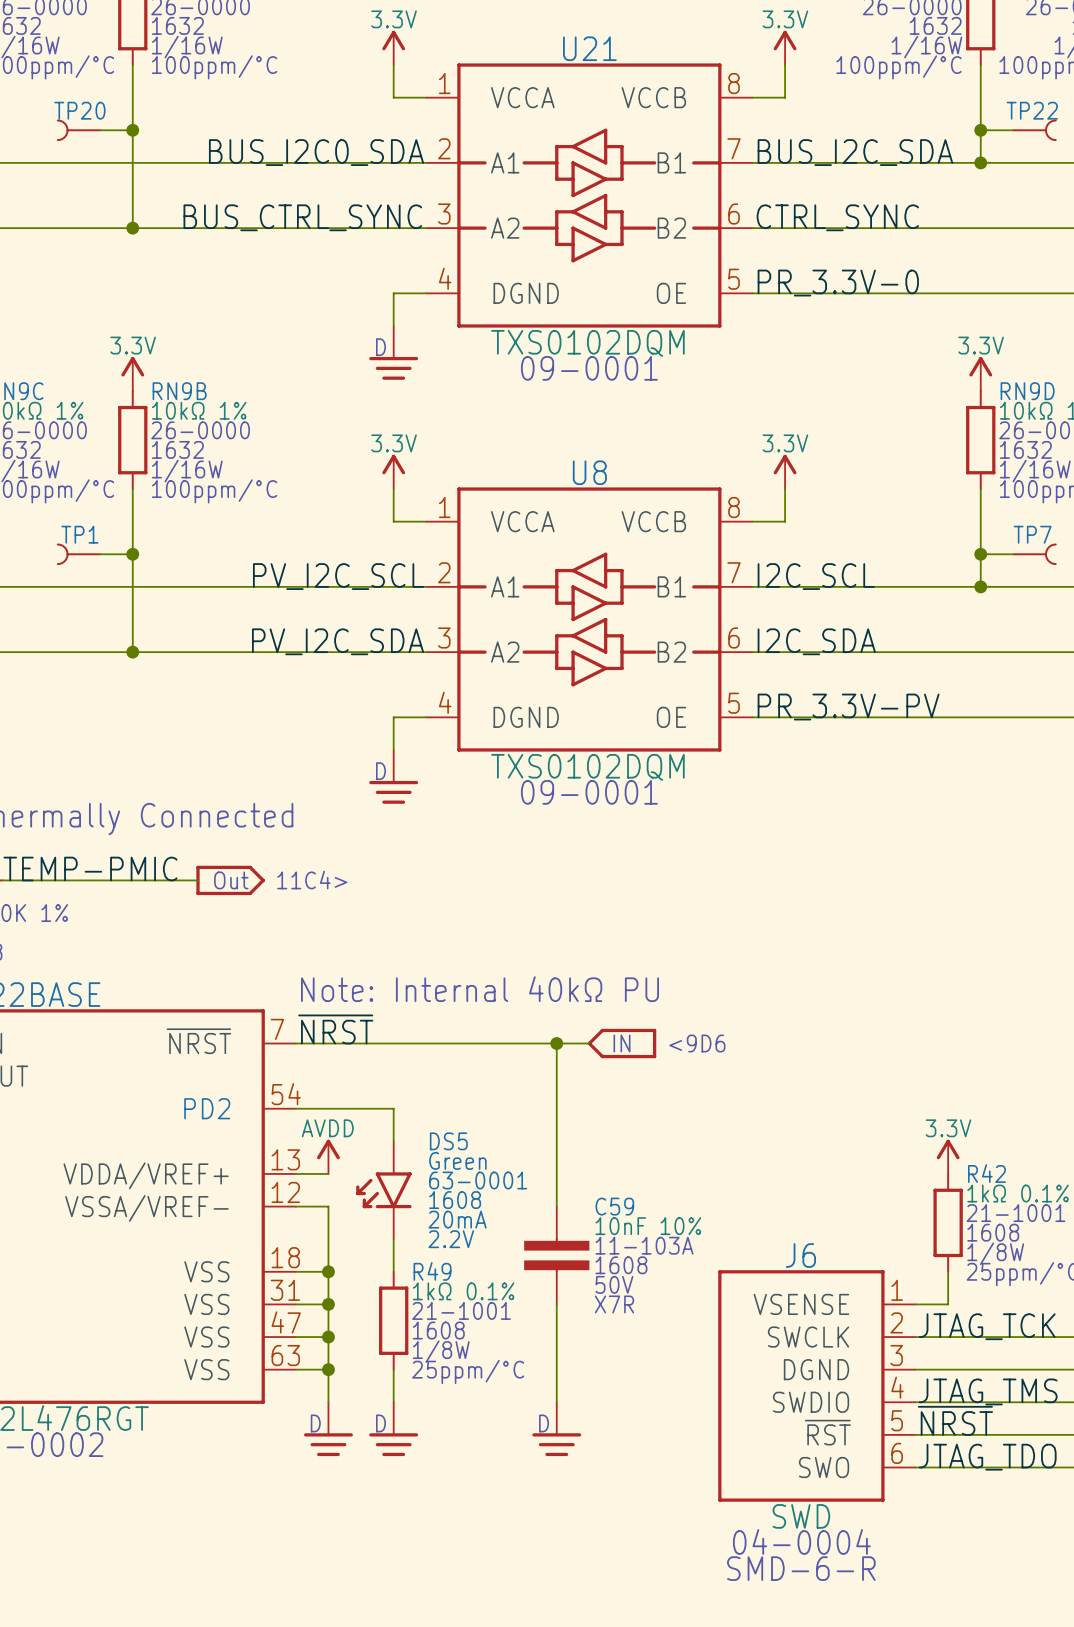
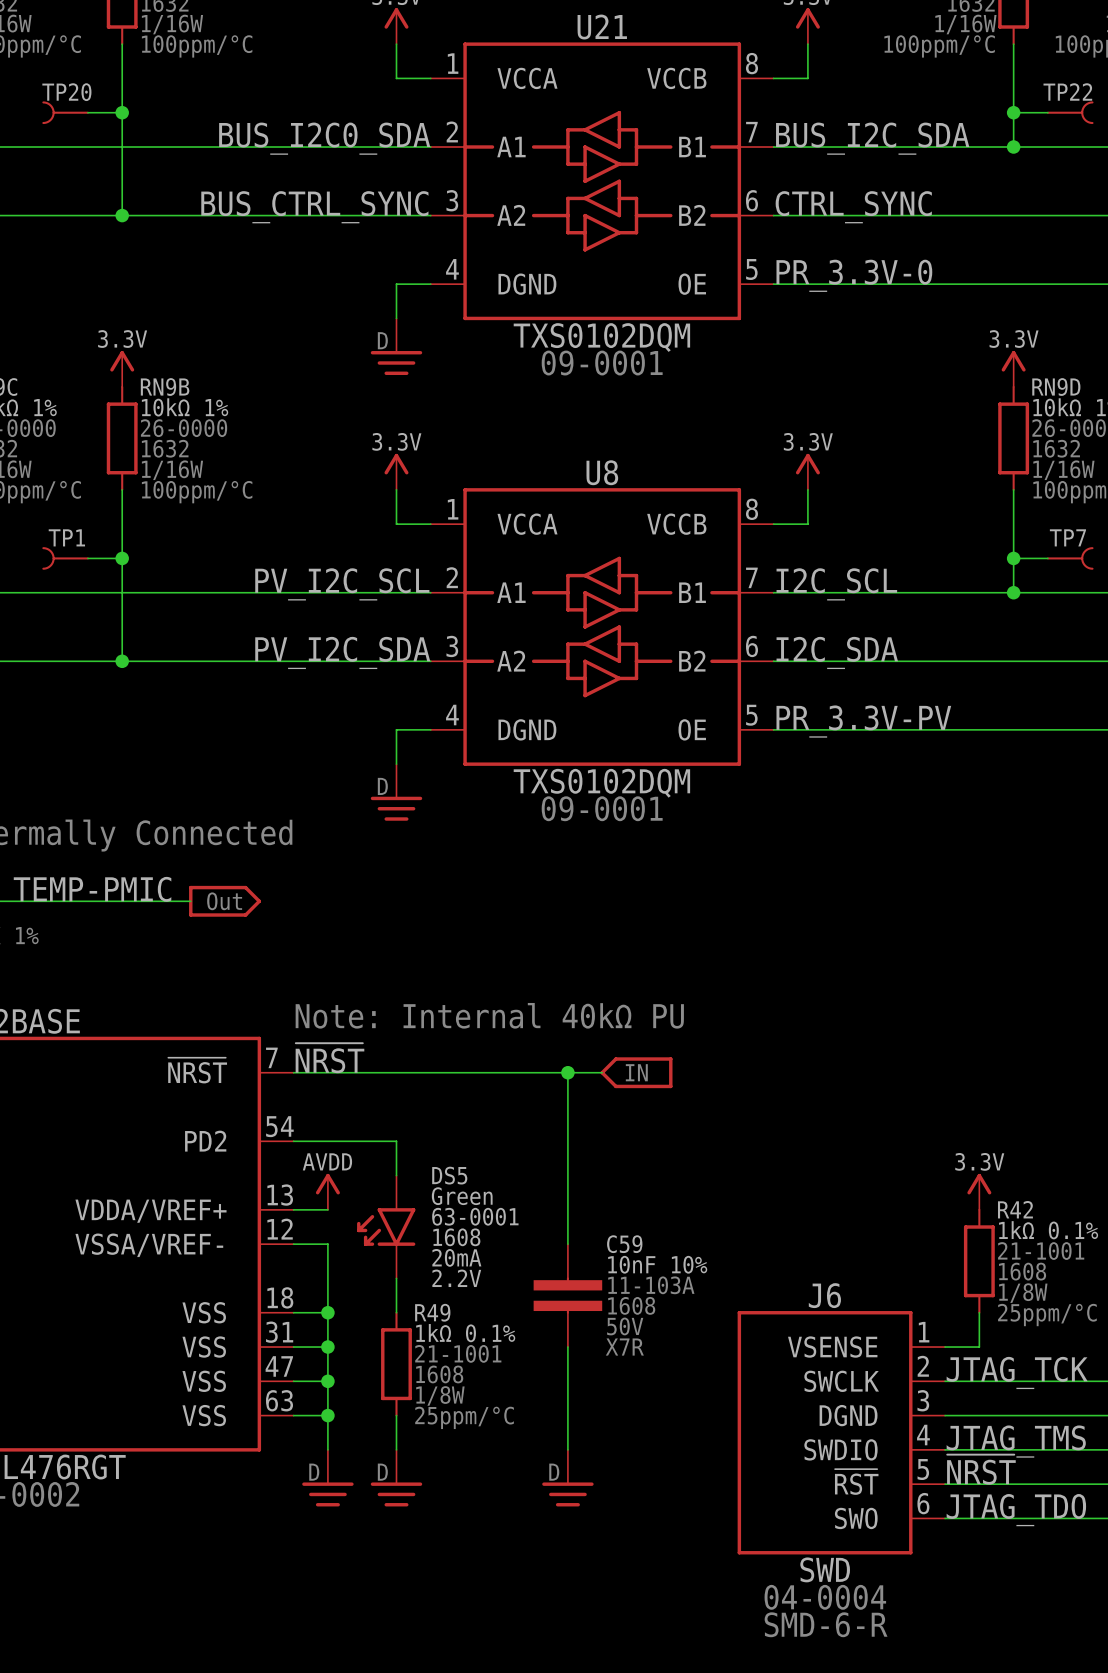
text: 11C4> (312, 880) -> none
text: <9D6 (697, 1043) -> none

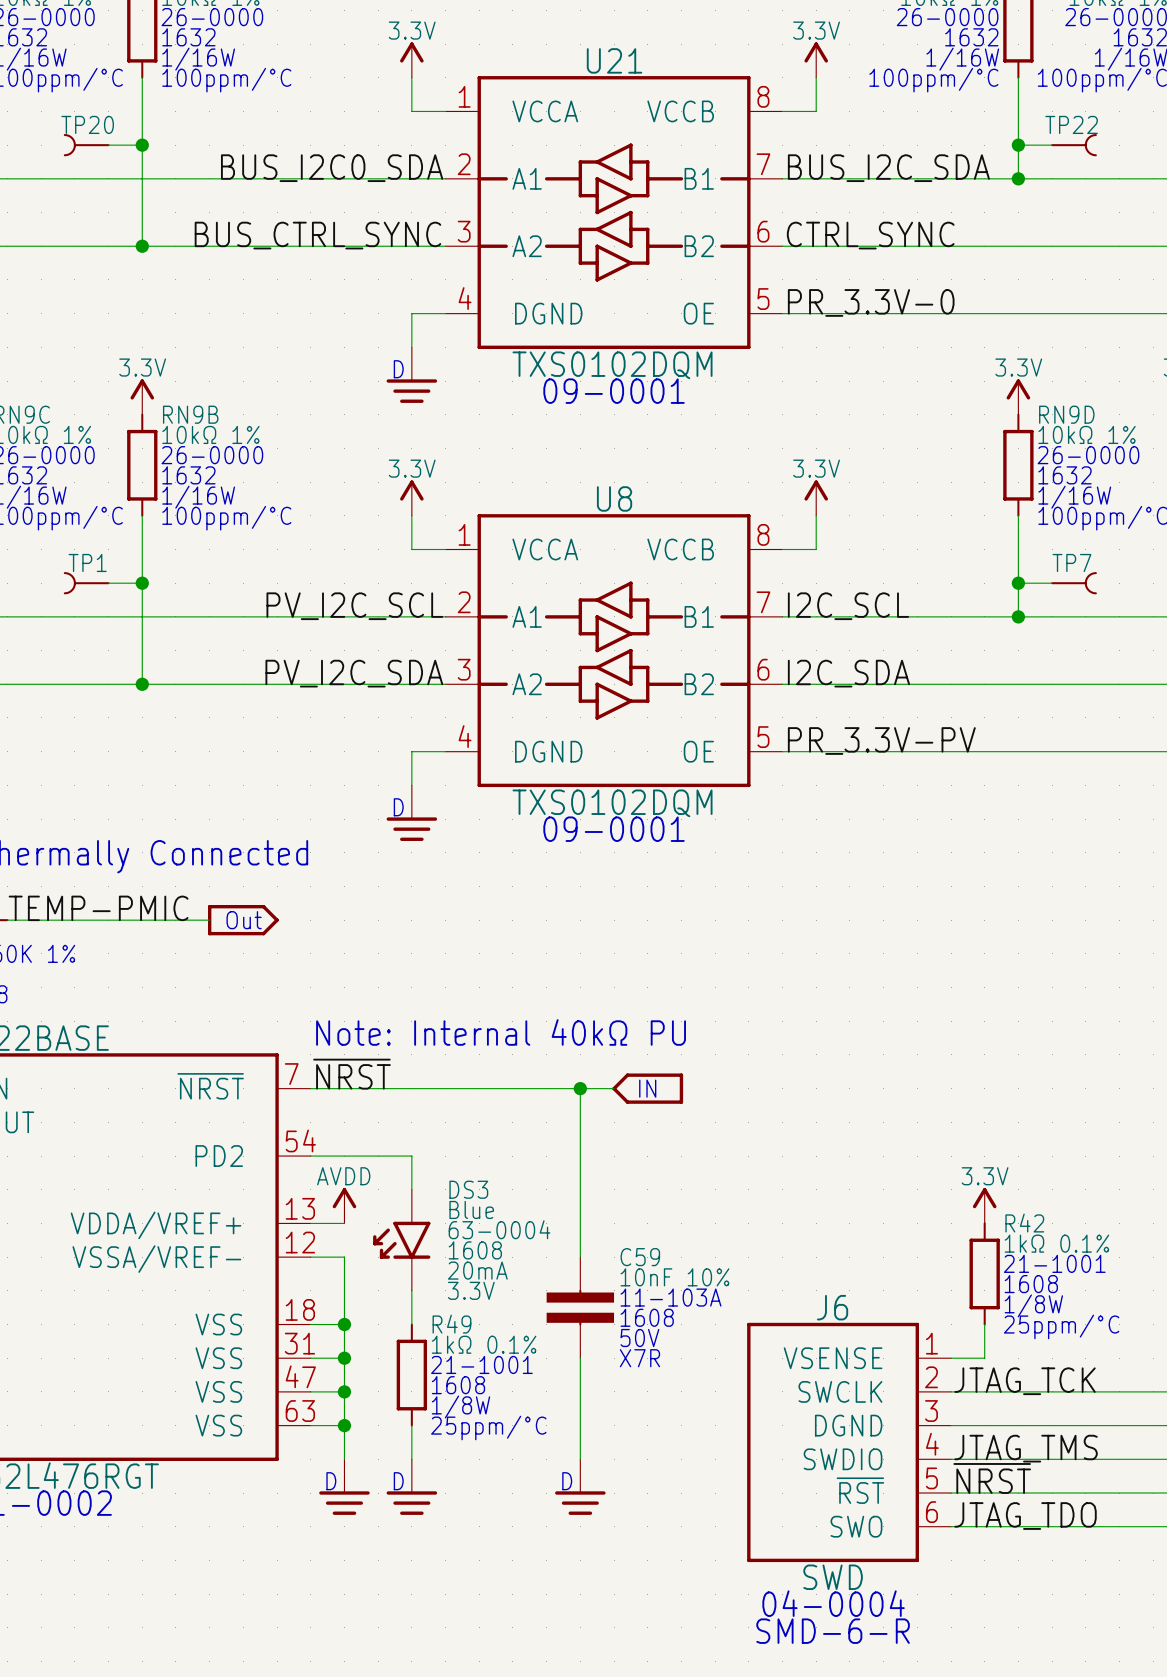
DS5 name: DS5 (449, 1175) -> DS3 (468, 1189)
DS5 value: Green (462, 1196) -> Blue (471, 1209)
DS5 text: 63-0001 (475, 1216) -> 63-0004 (499, 1229)
DS5 text: 2.2V (456, 1278) -> 3.3V (471, 1290)

